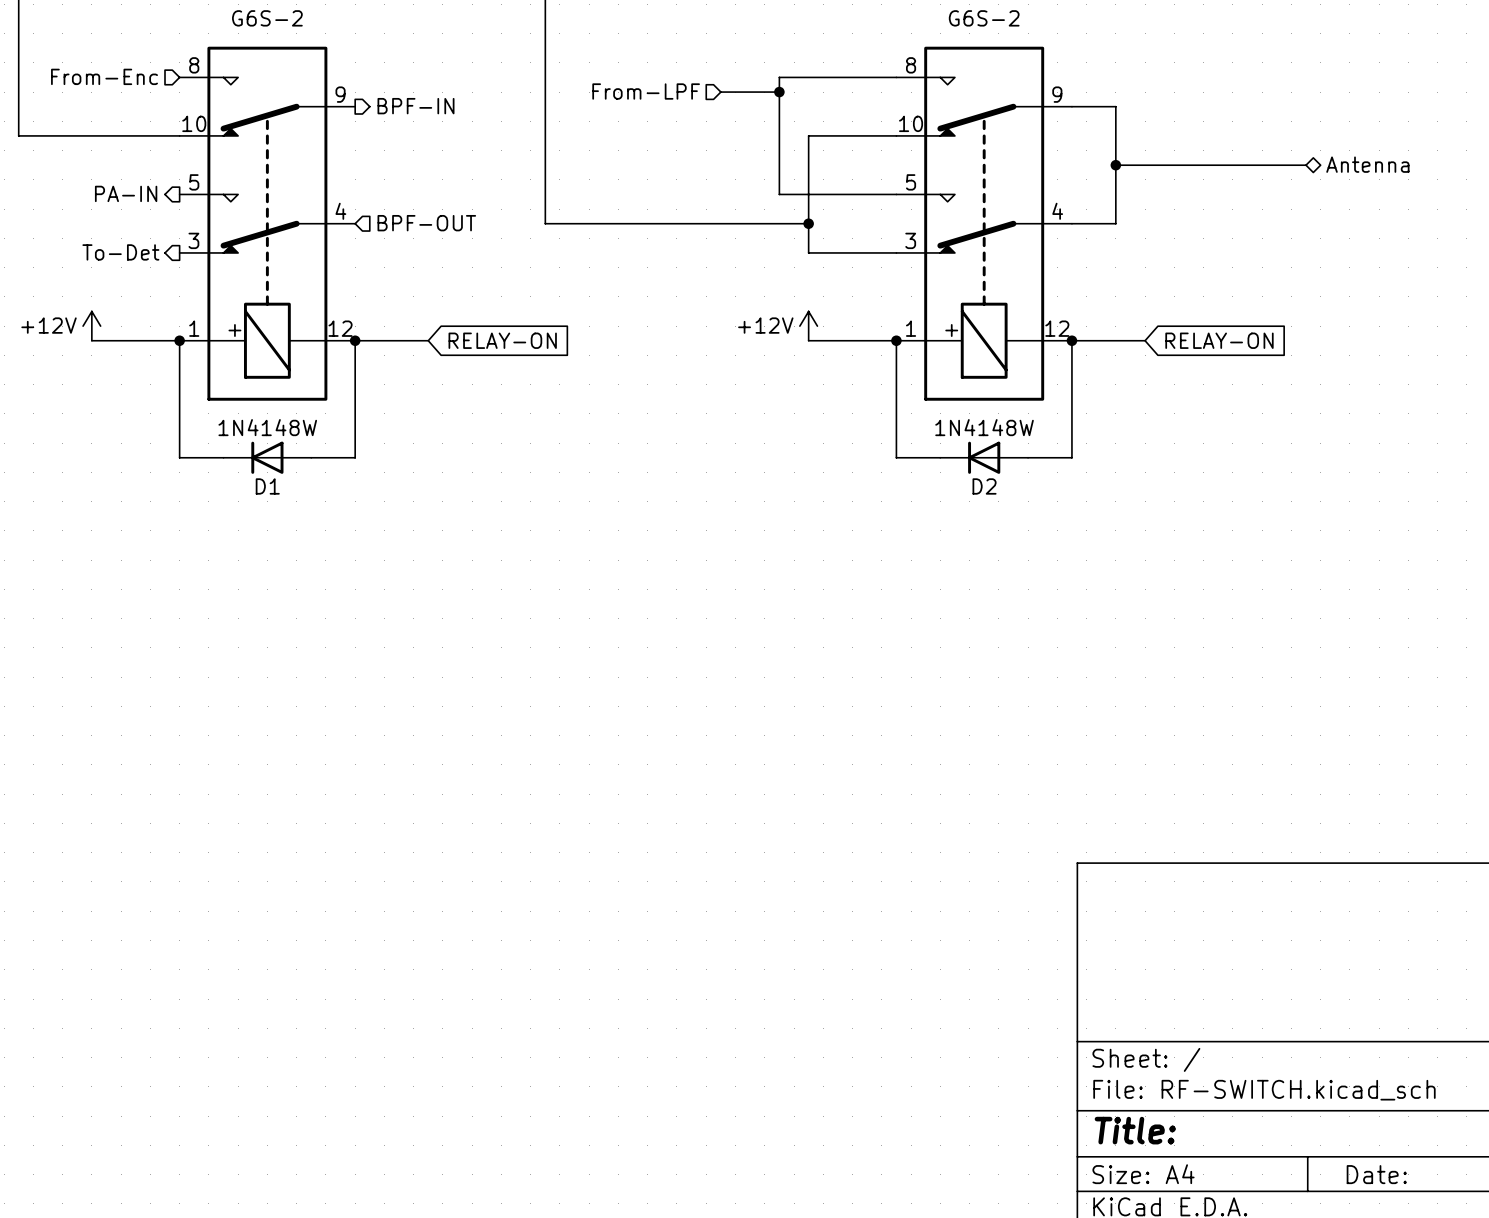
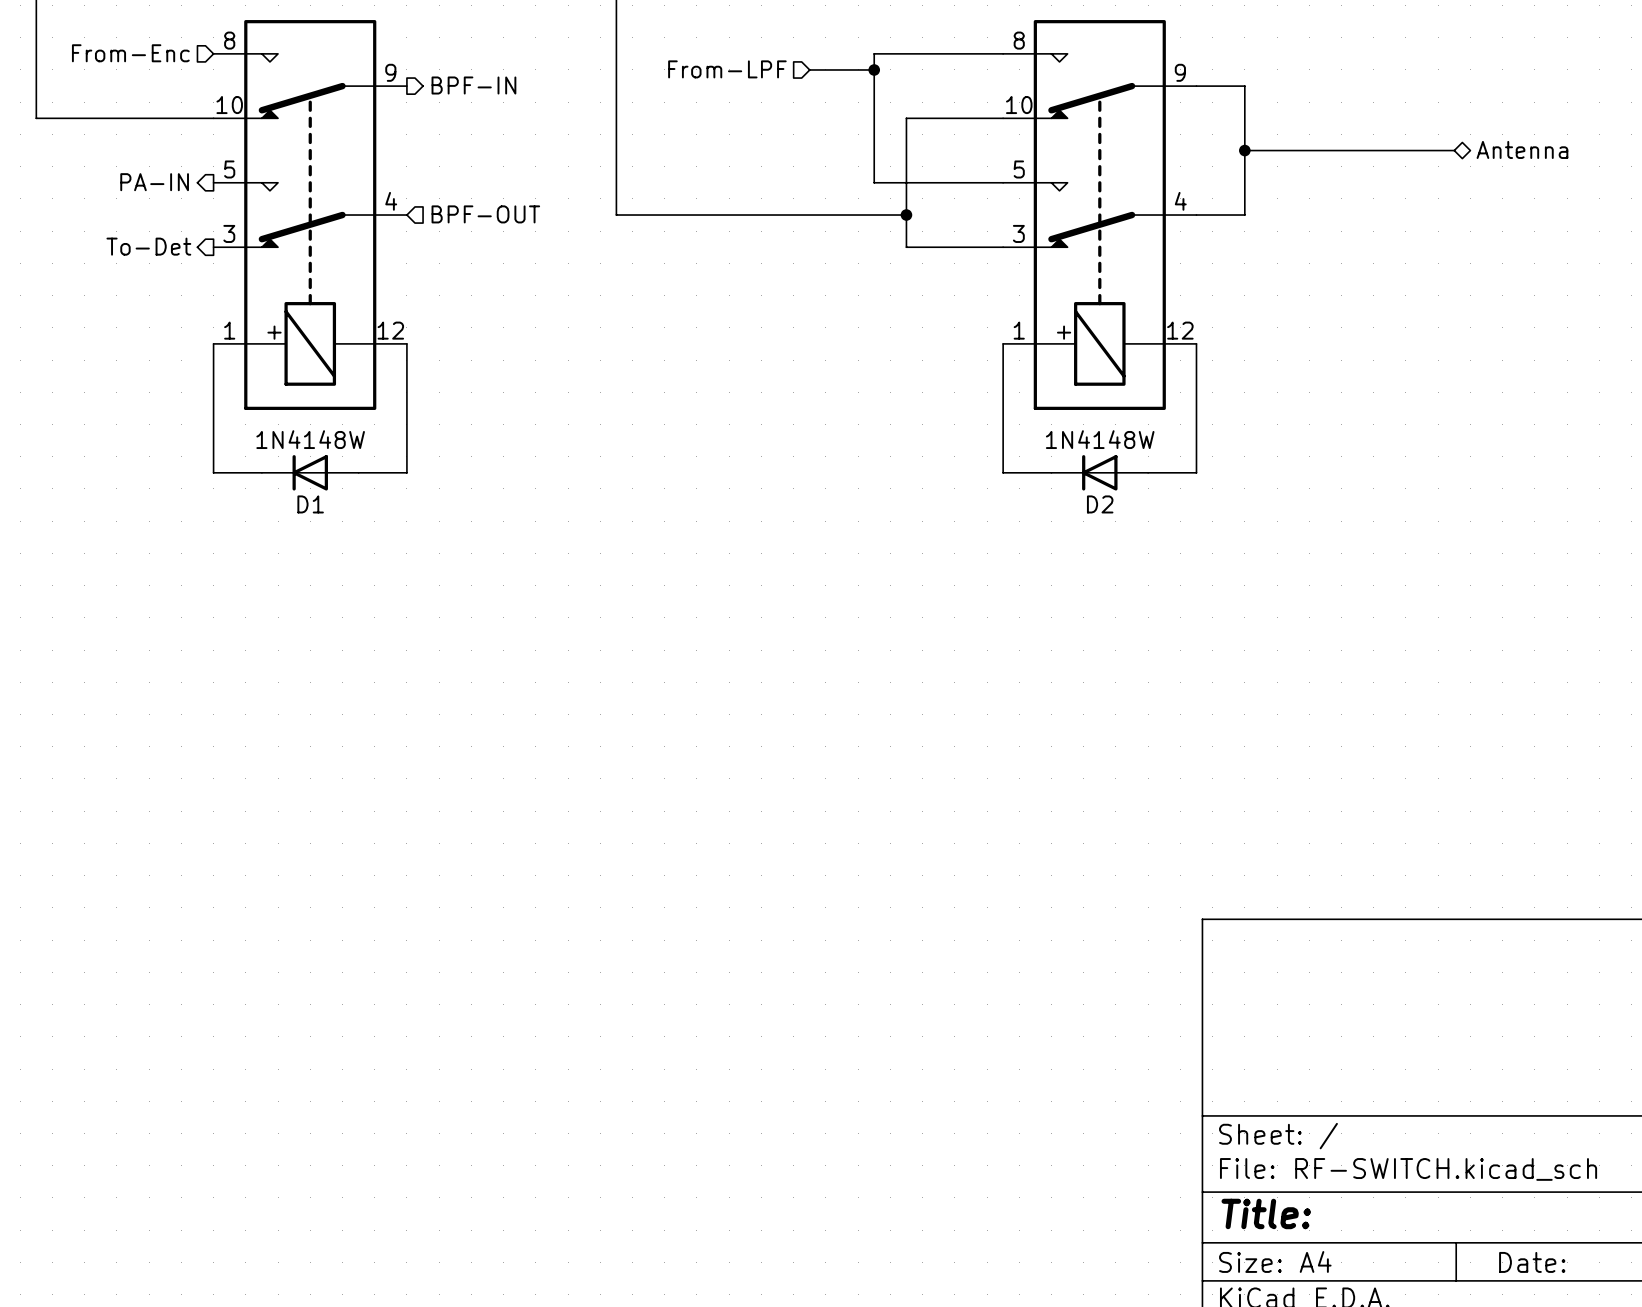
power symbol: +12V (91, 326) -> none
power symbol: +12V (808, 326) -> none
wire: (91, 340) (179, 340) -> none
junction: (179, 340) -> none
wire: (355, 340) (428, 340) -> none
junction: (355, 340) -> none
global label: RELAY-ON (502, 340) -> none
wire: (808, 340) (896, 340) -> none
junction: (896, 340) -> none
wire: (1071, 340) (1145, 340) -> none
junction: (1071, 340) -> none
global label: RELAY-ON (1219, 340) -> none

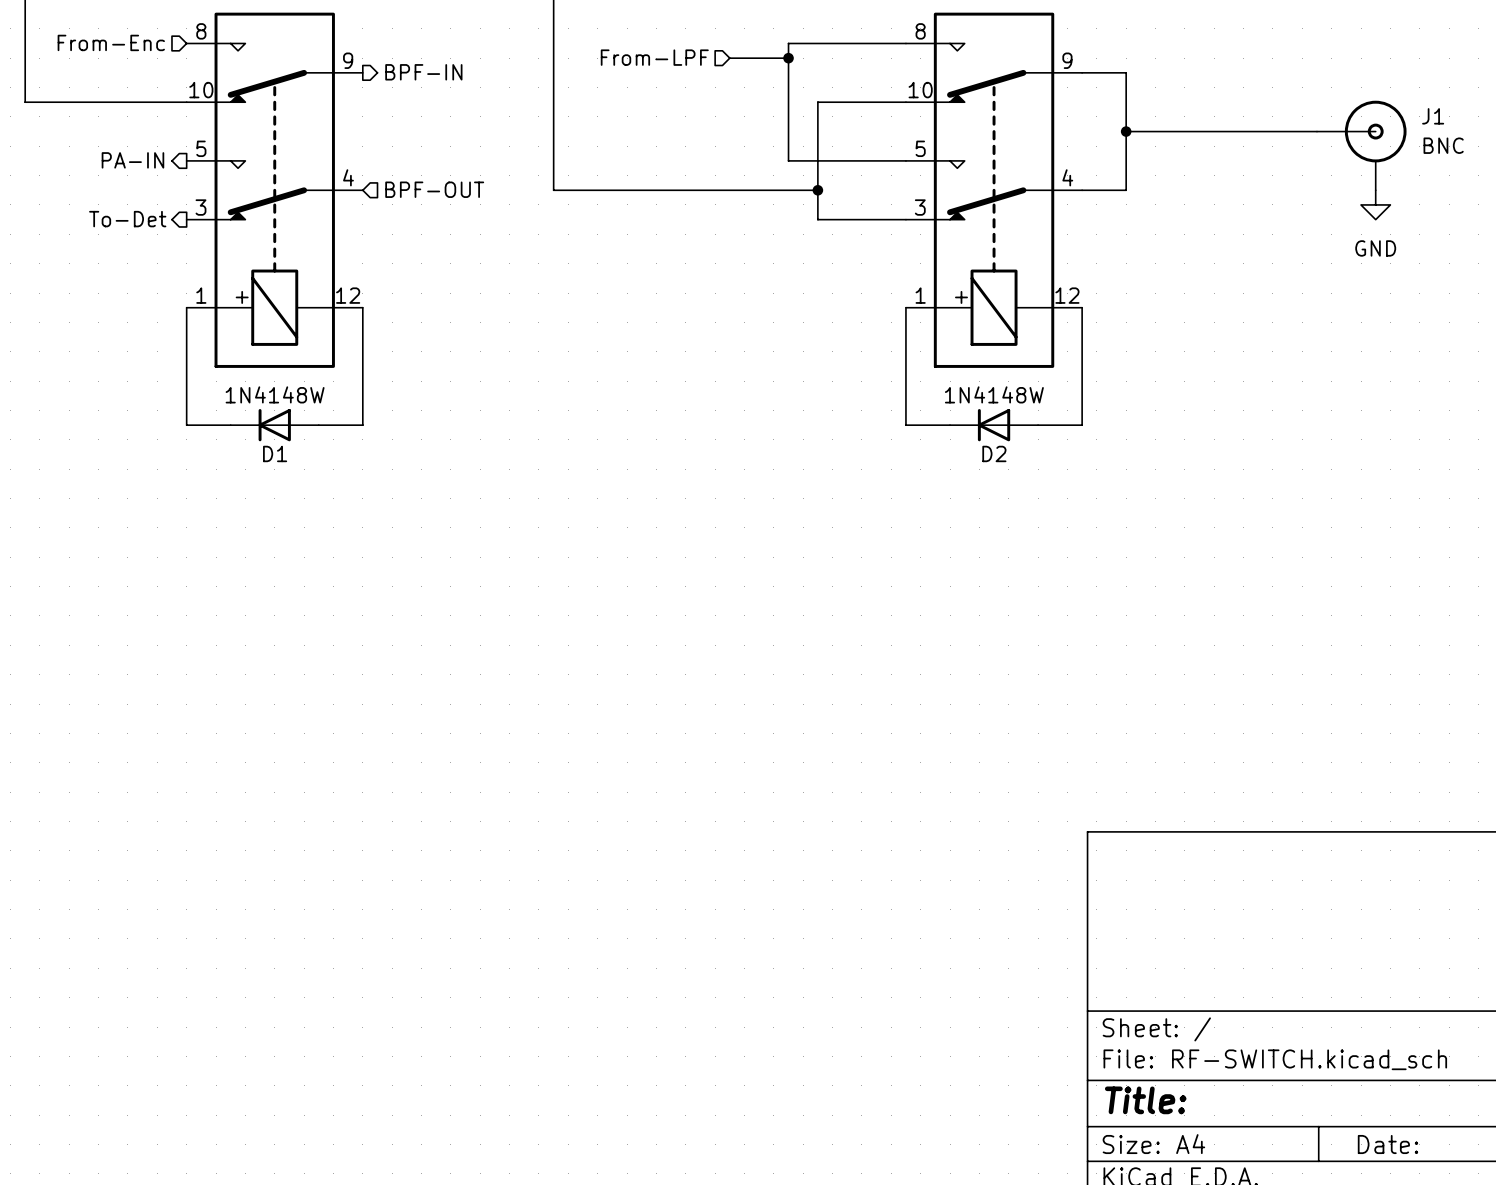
hierarchical label: Antenna (1522, 149) -> none
J1: none -> BNC (1361, 145)
power symbol: none -> GND (1375, 204)

